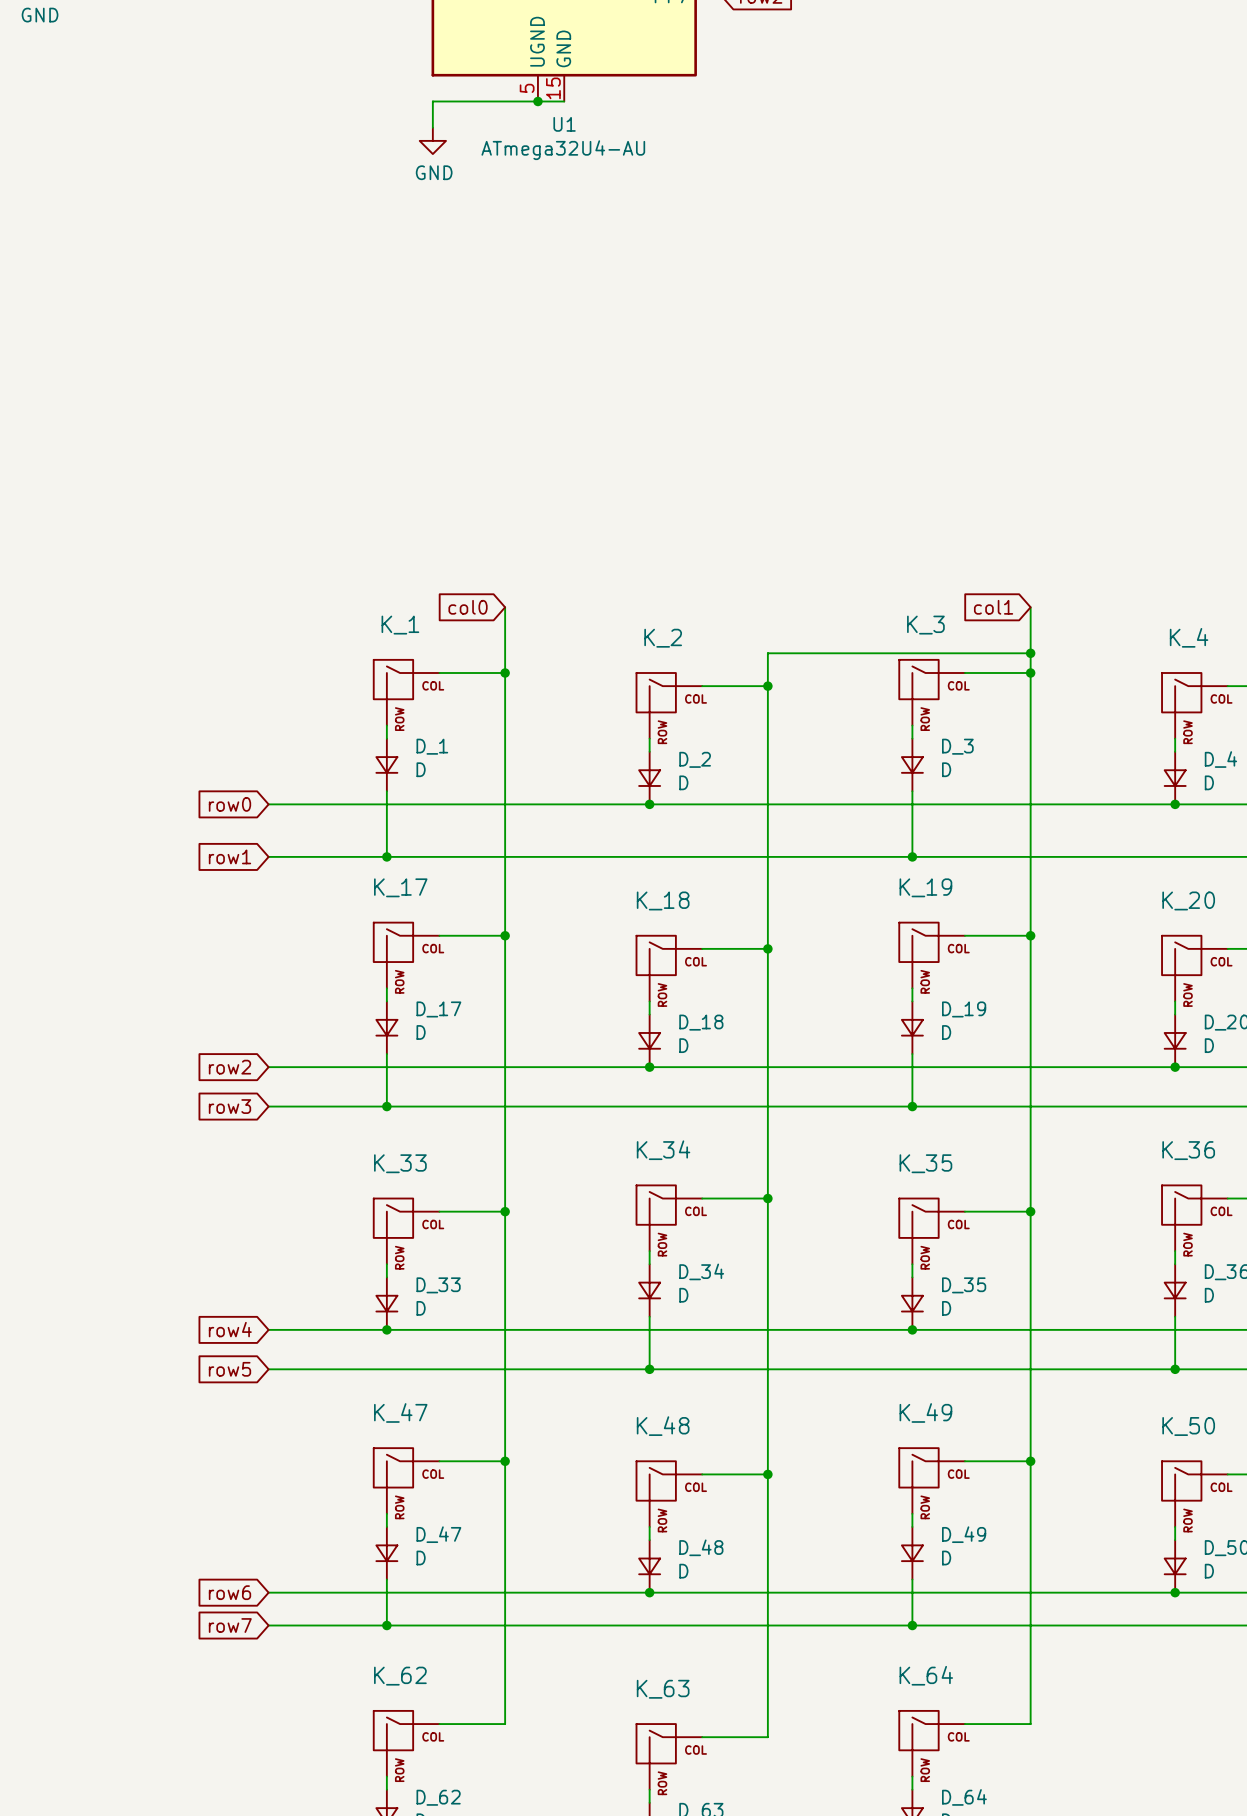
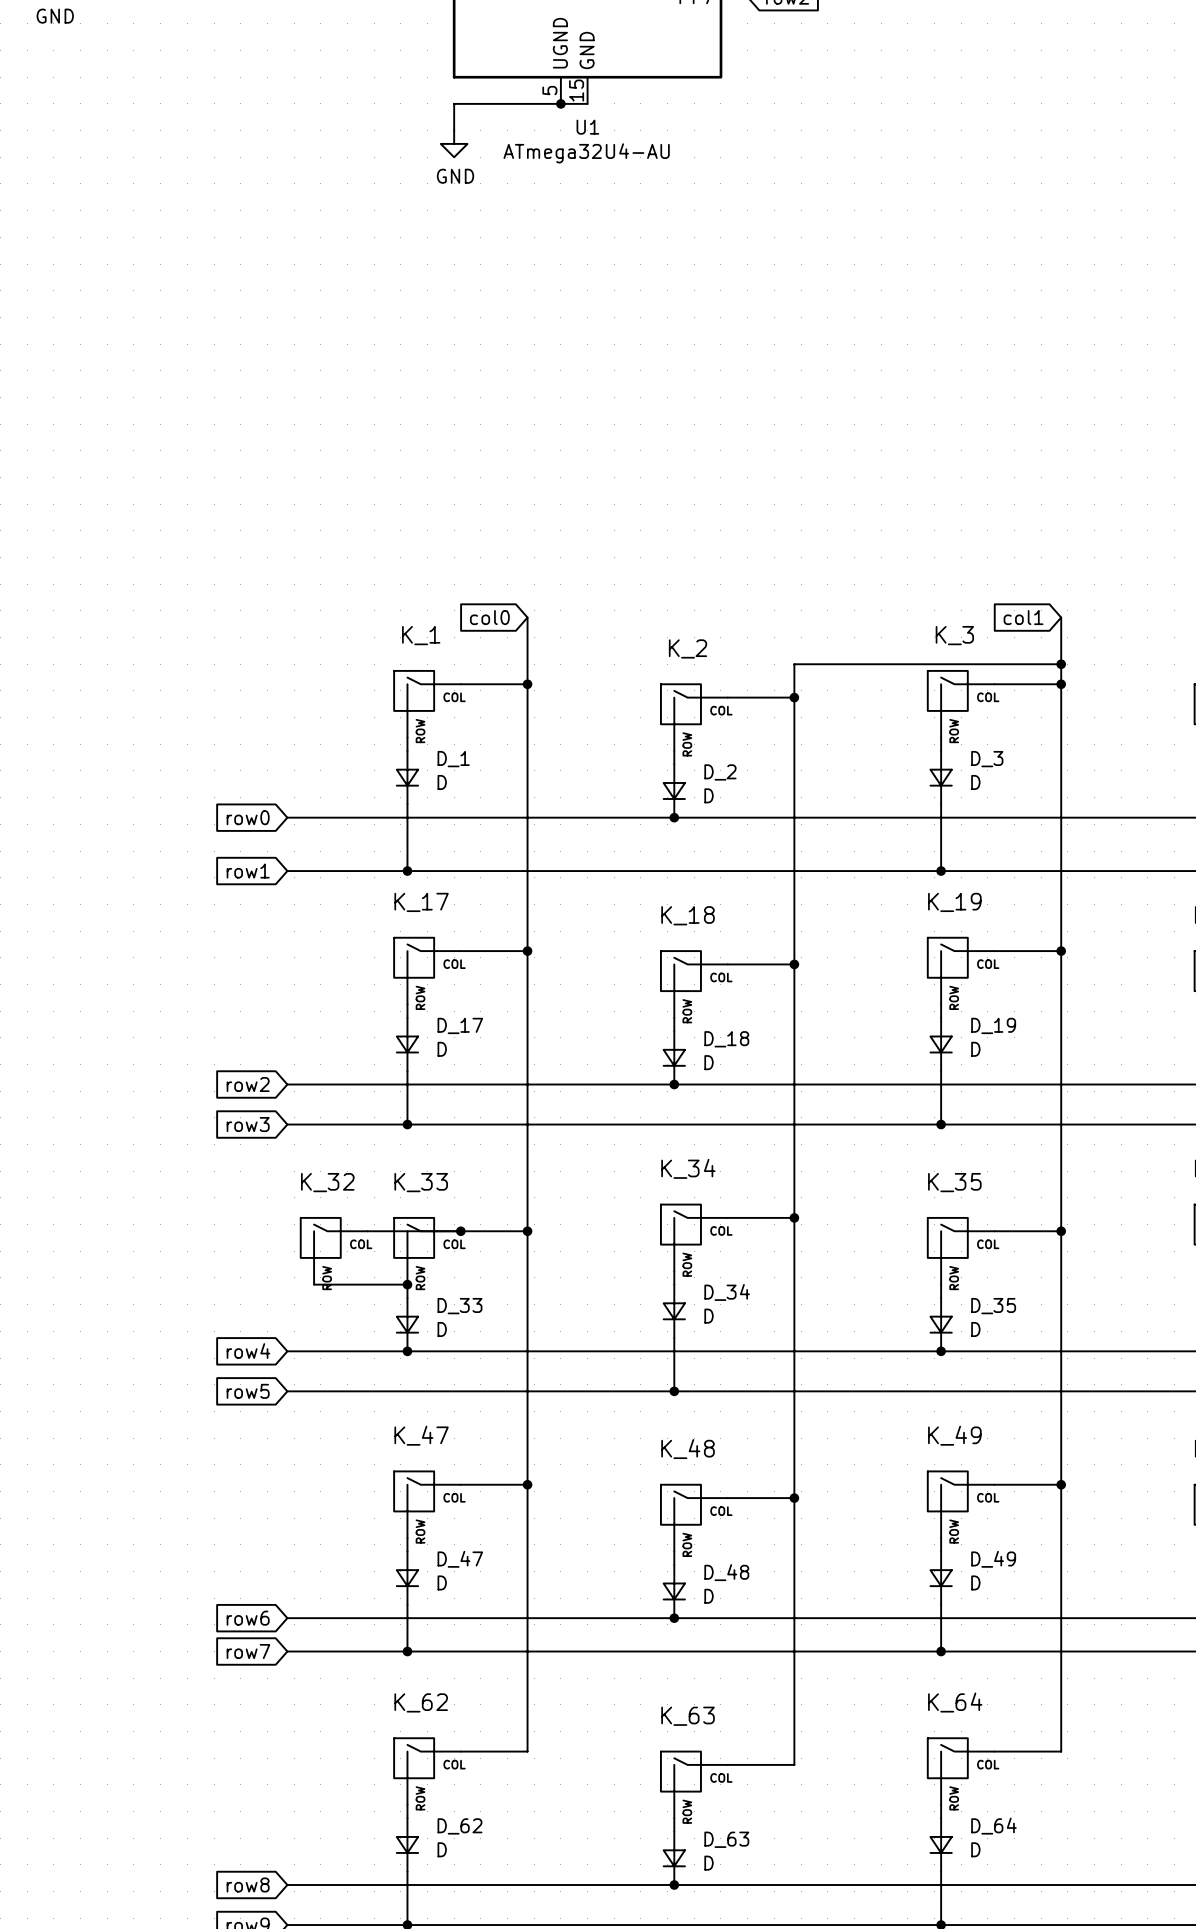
wire: none -> (367, 1231) (460, 1231)
junction: none -> (460, 1231)
K_32: none -> (334, 1251)
wire: none -> (314, 1284) (407, 1284)
junction: none -> (407, 1284)

